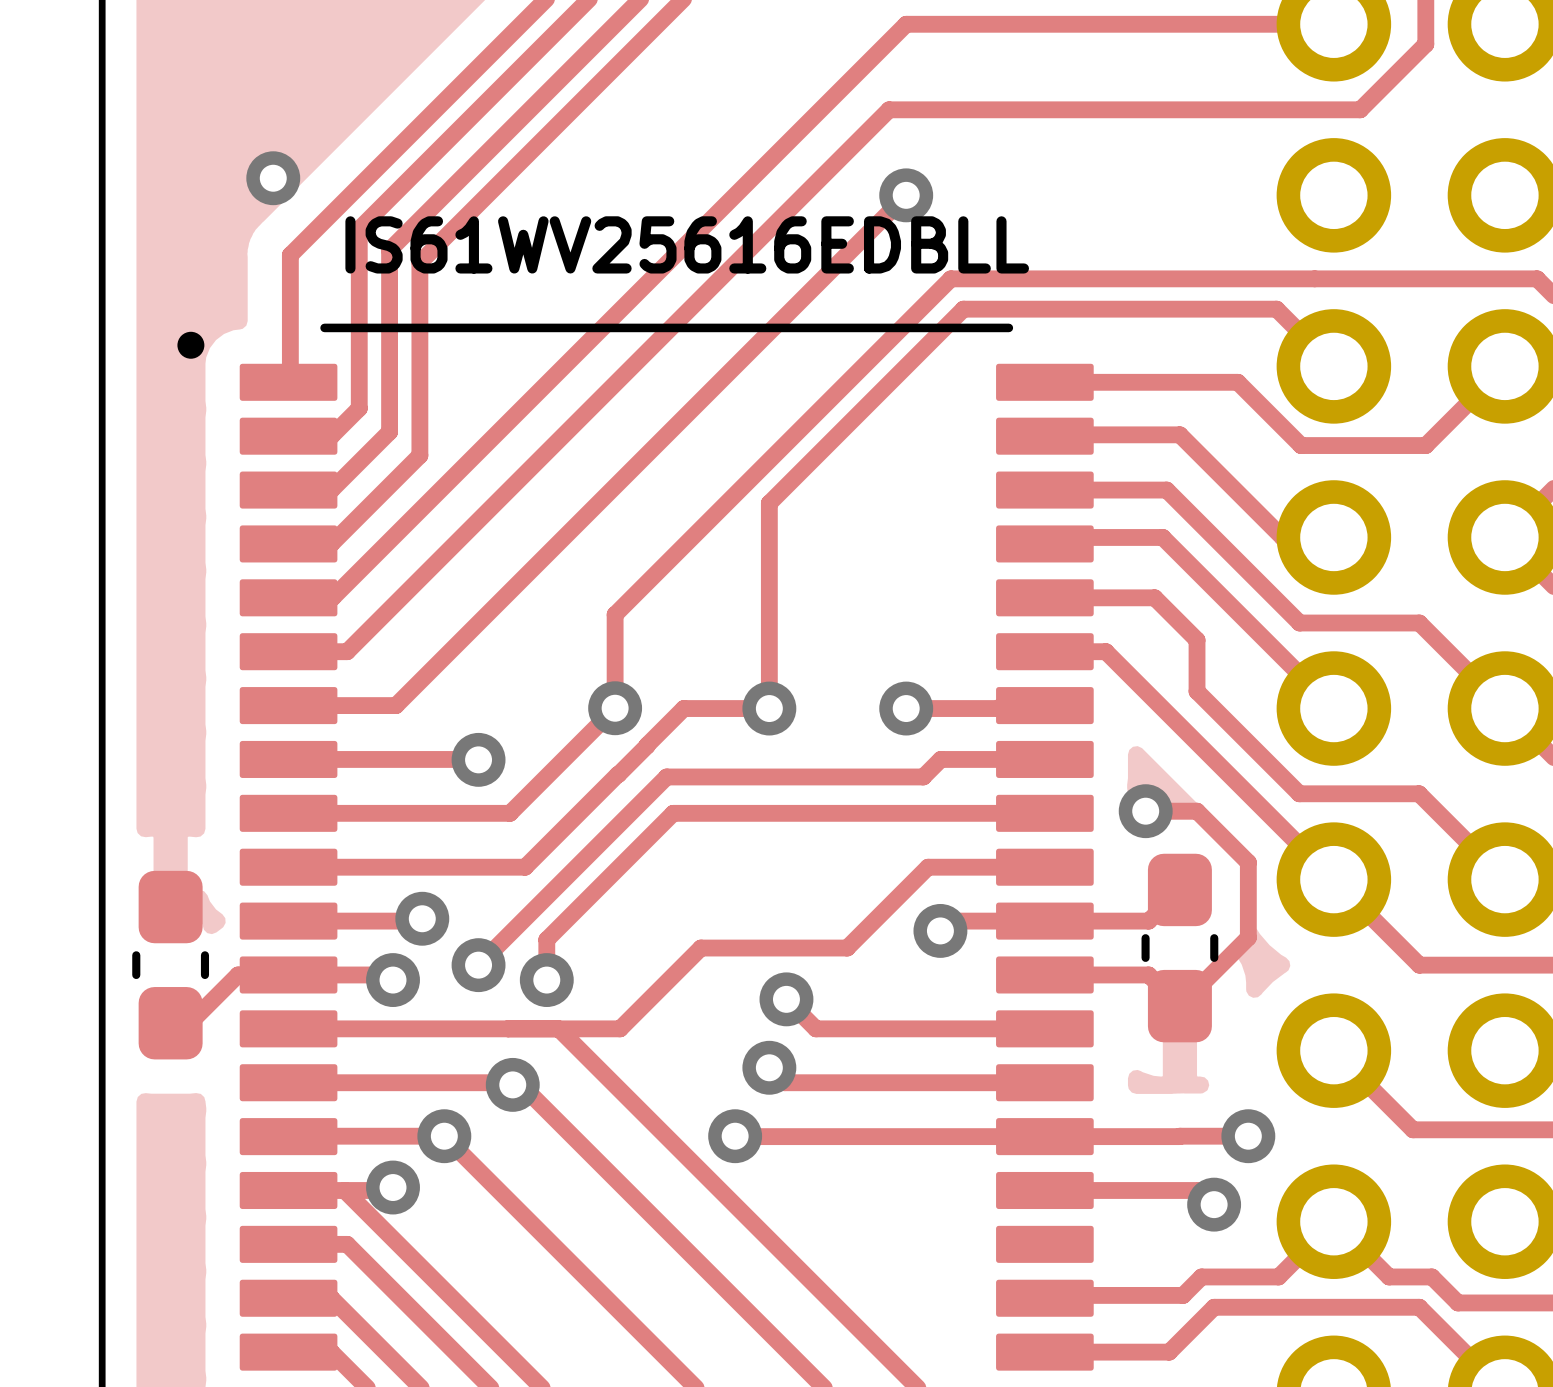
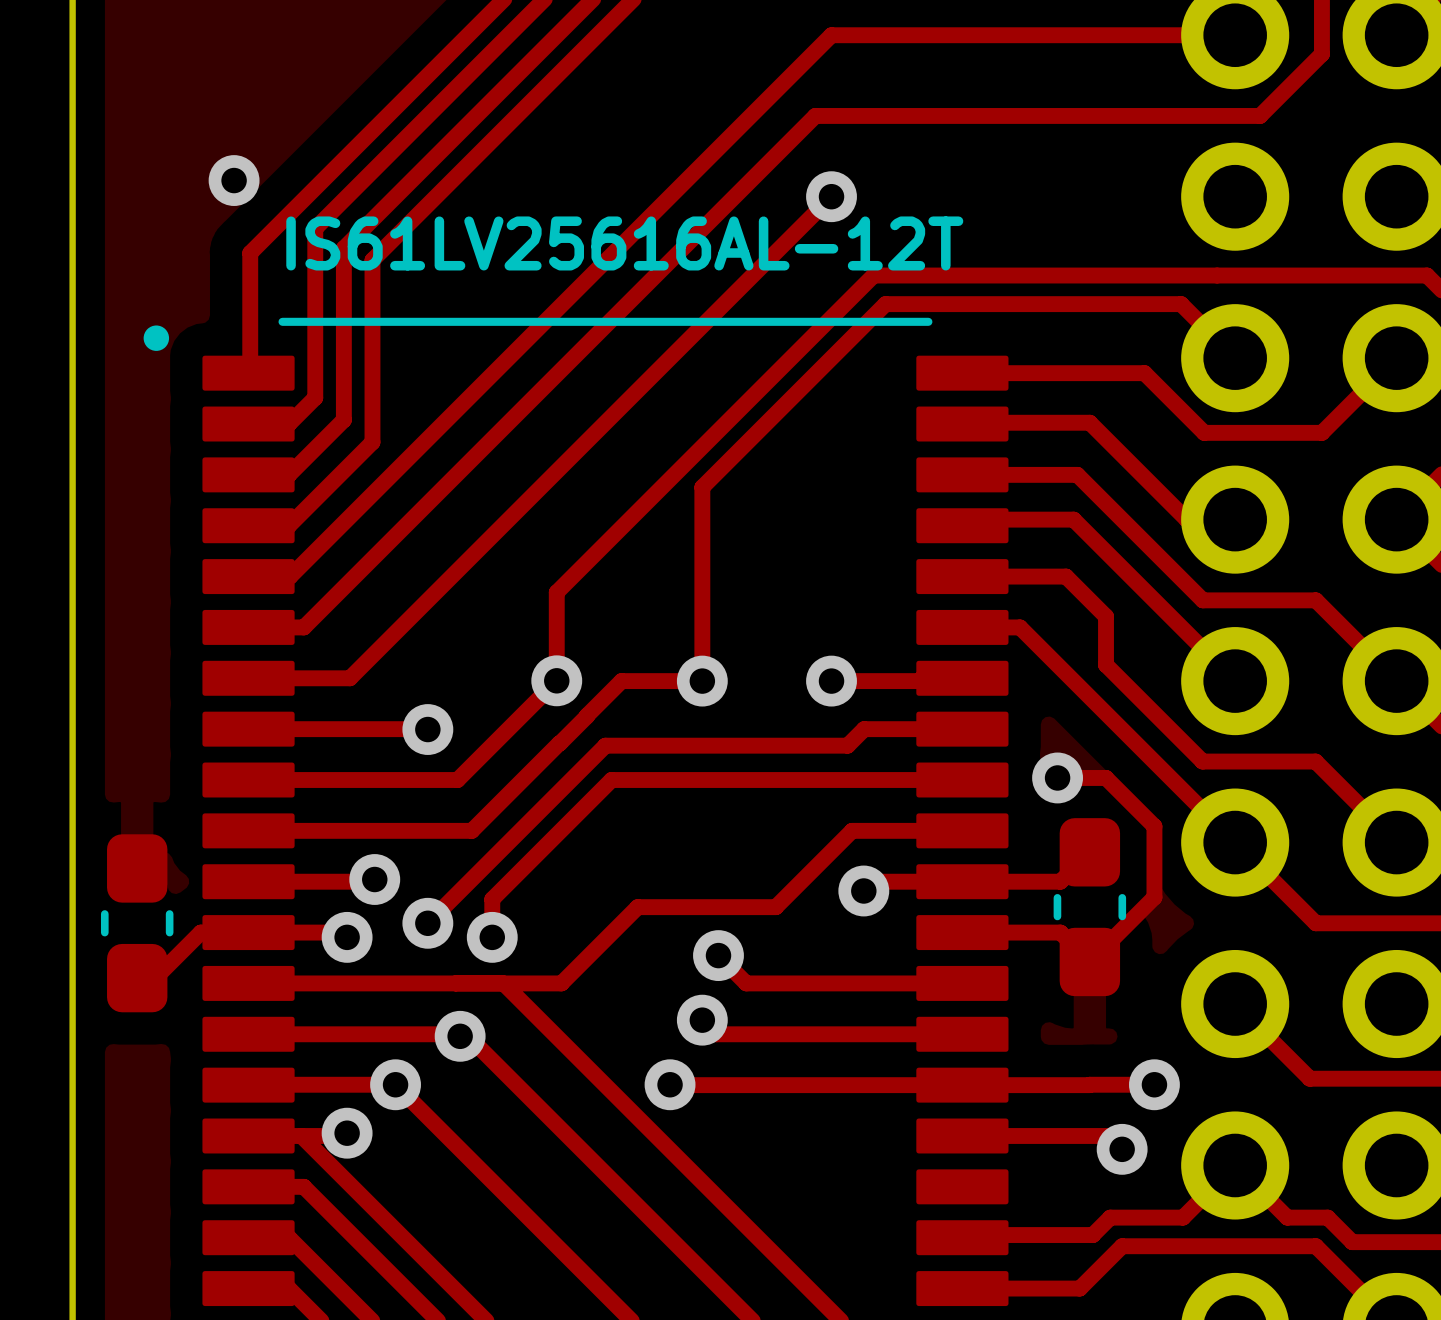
part value: IS61WV25616EDBLL (687, 244) -> IS61LV25616AL-12T (624, 243)

